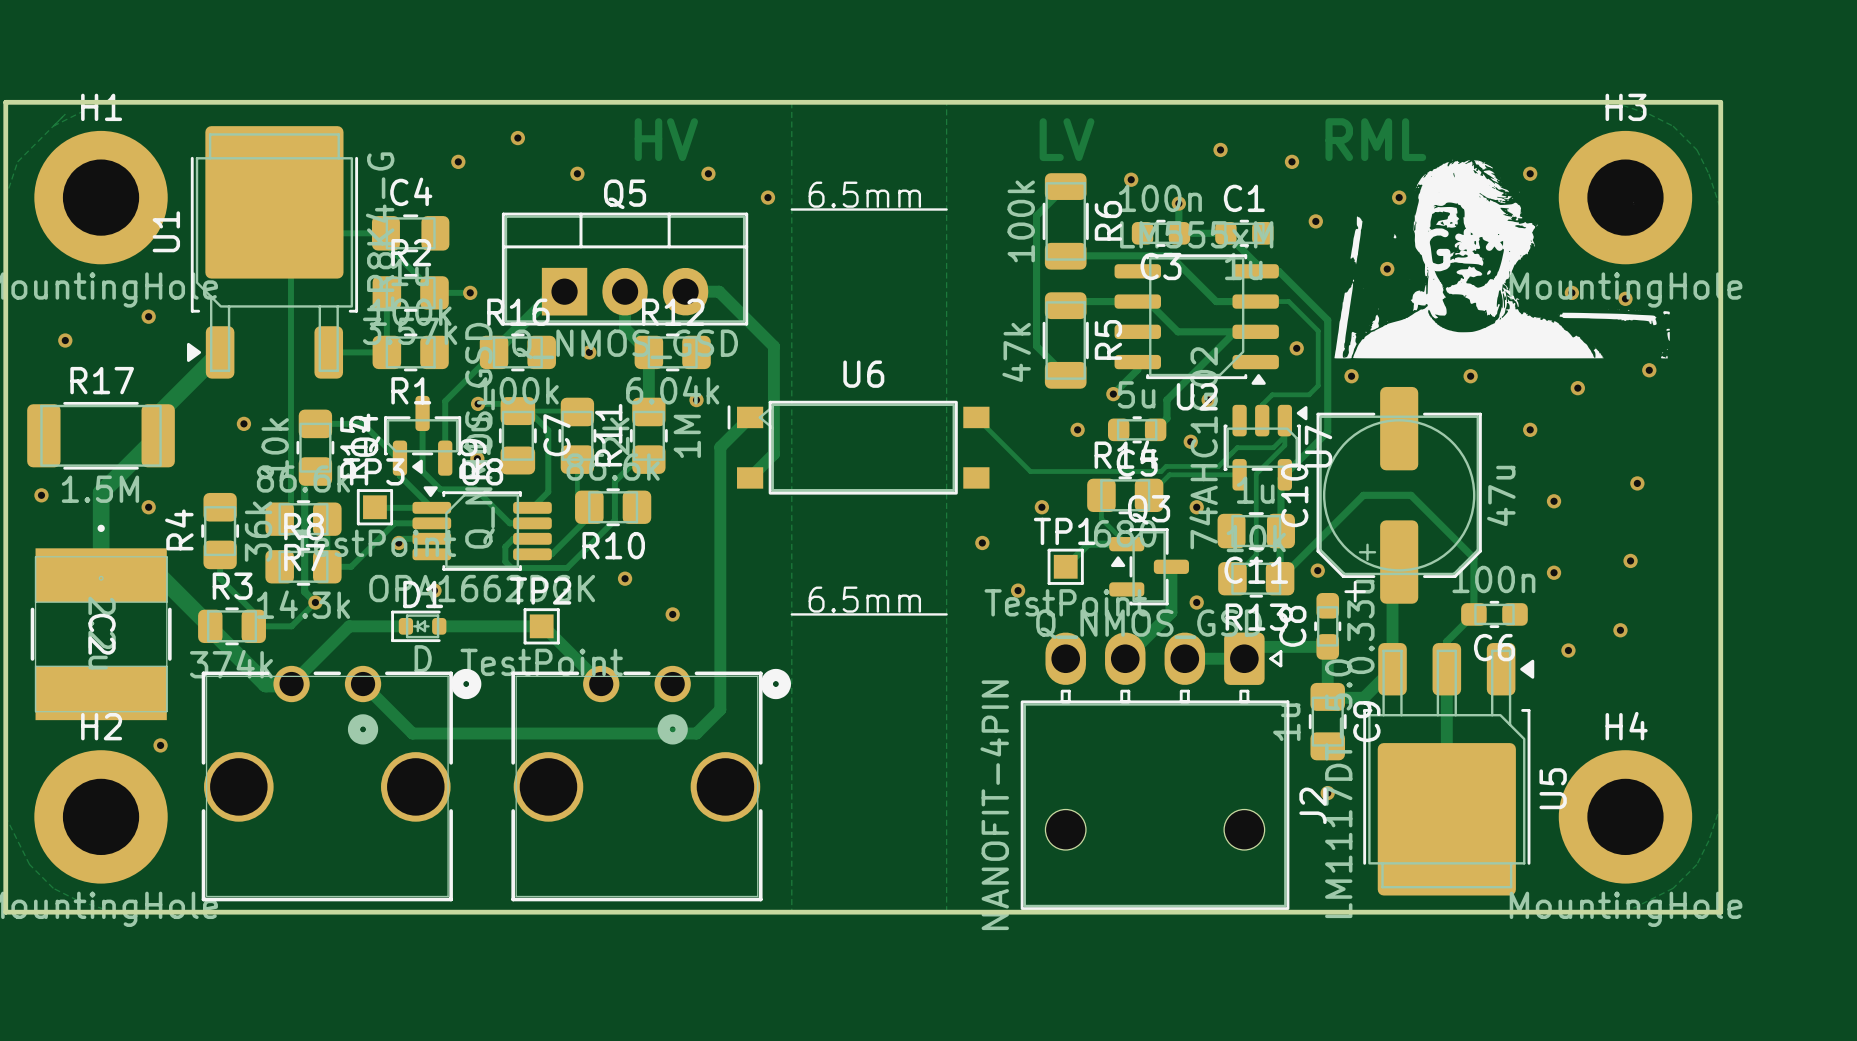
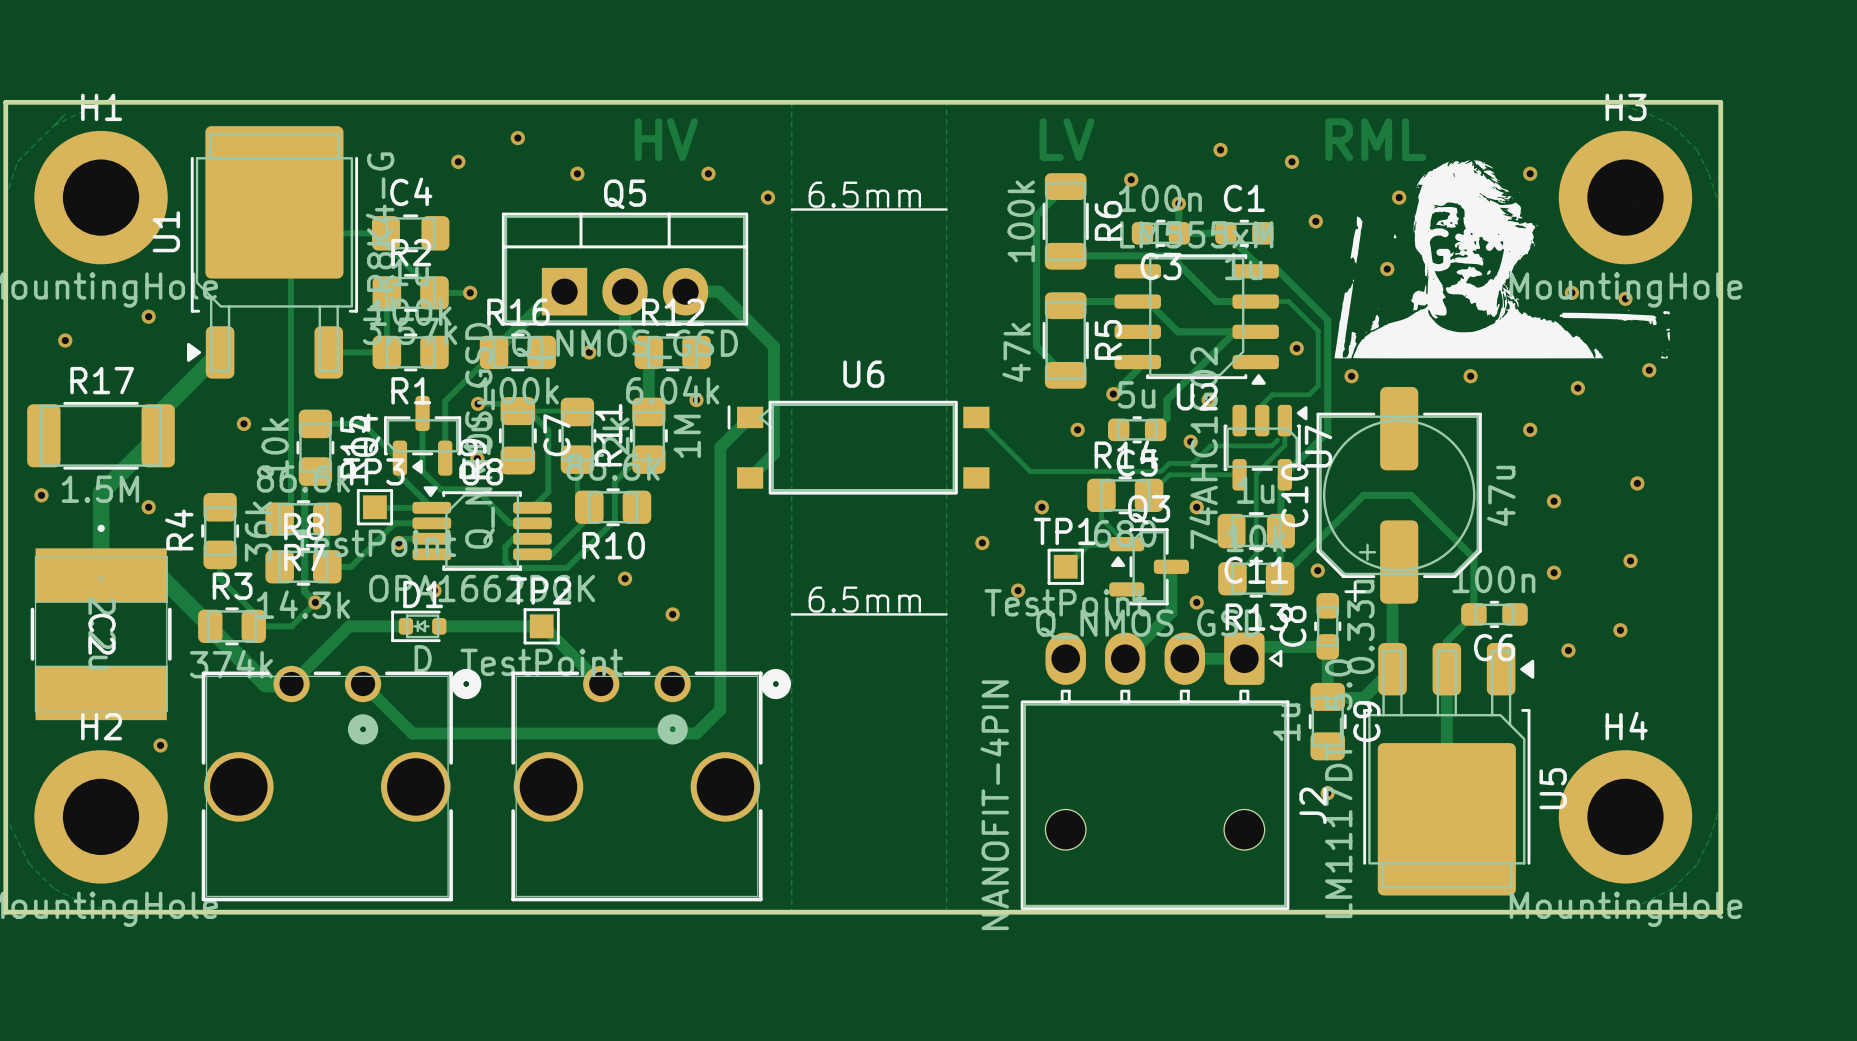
track: (1284, 436) (1273, 447) (1237, 447) (1218, 466) (1166, 466) -> (1277, 439) (1271, 445) (1210, 445) (1192, 463) (1169, 463) (1166, 466)

